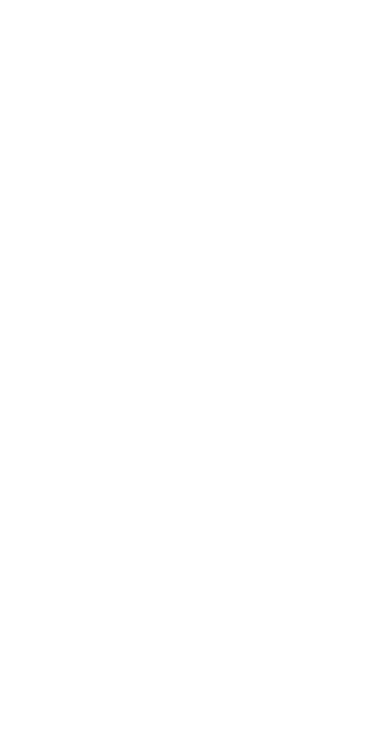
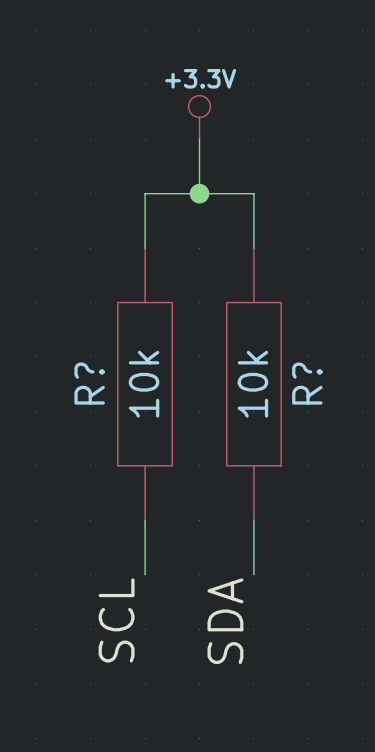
power symbol: none -> +3.3V (199, 117)
wire: none -> (199, 139) (199, 193)
junction: none -> (199, 193)
wire: none -> (145, 248) (145, 193) (253, 193) (253, 248)
R?: none -> 10k (145, 384)
R?: none -> 10k (253, 384)
wire: none -> (145, 520) (145, 574)
wire: none -> (253, 520) (253, 574)
label: none -> SCL (116, 620)
label: none -> SDA (225, 621)

